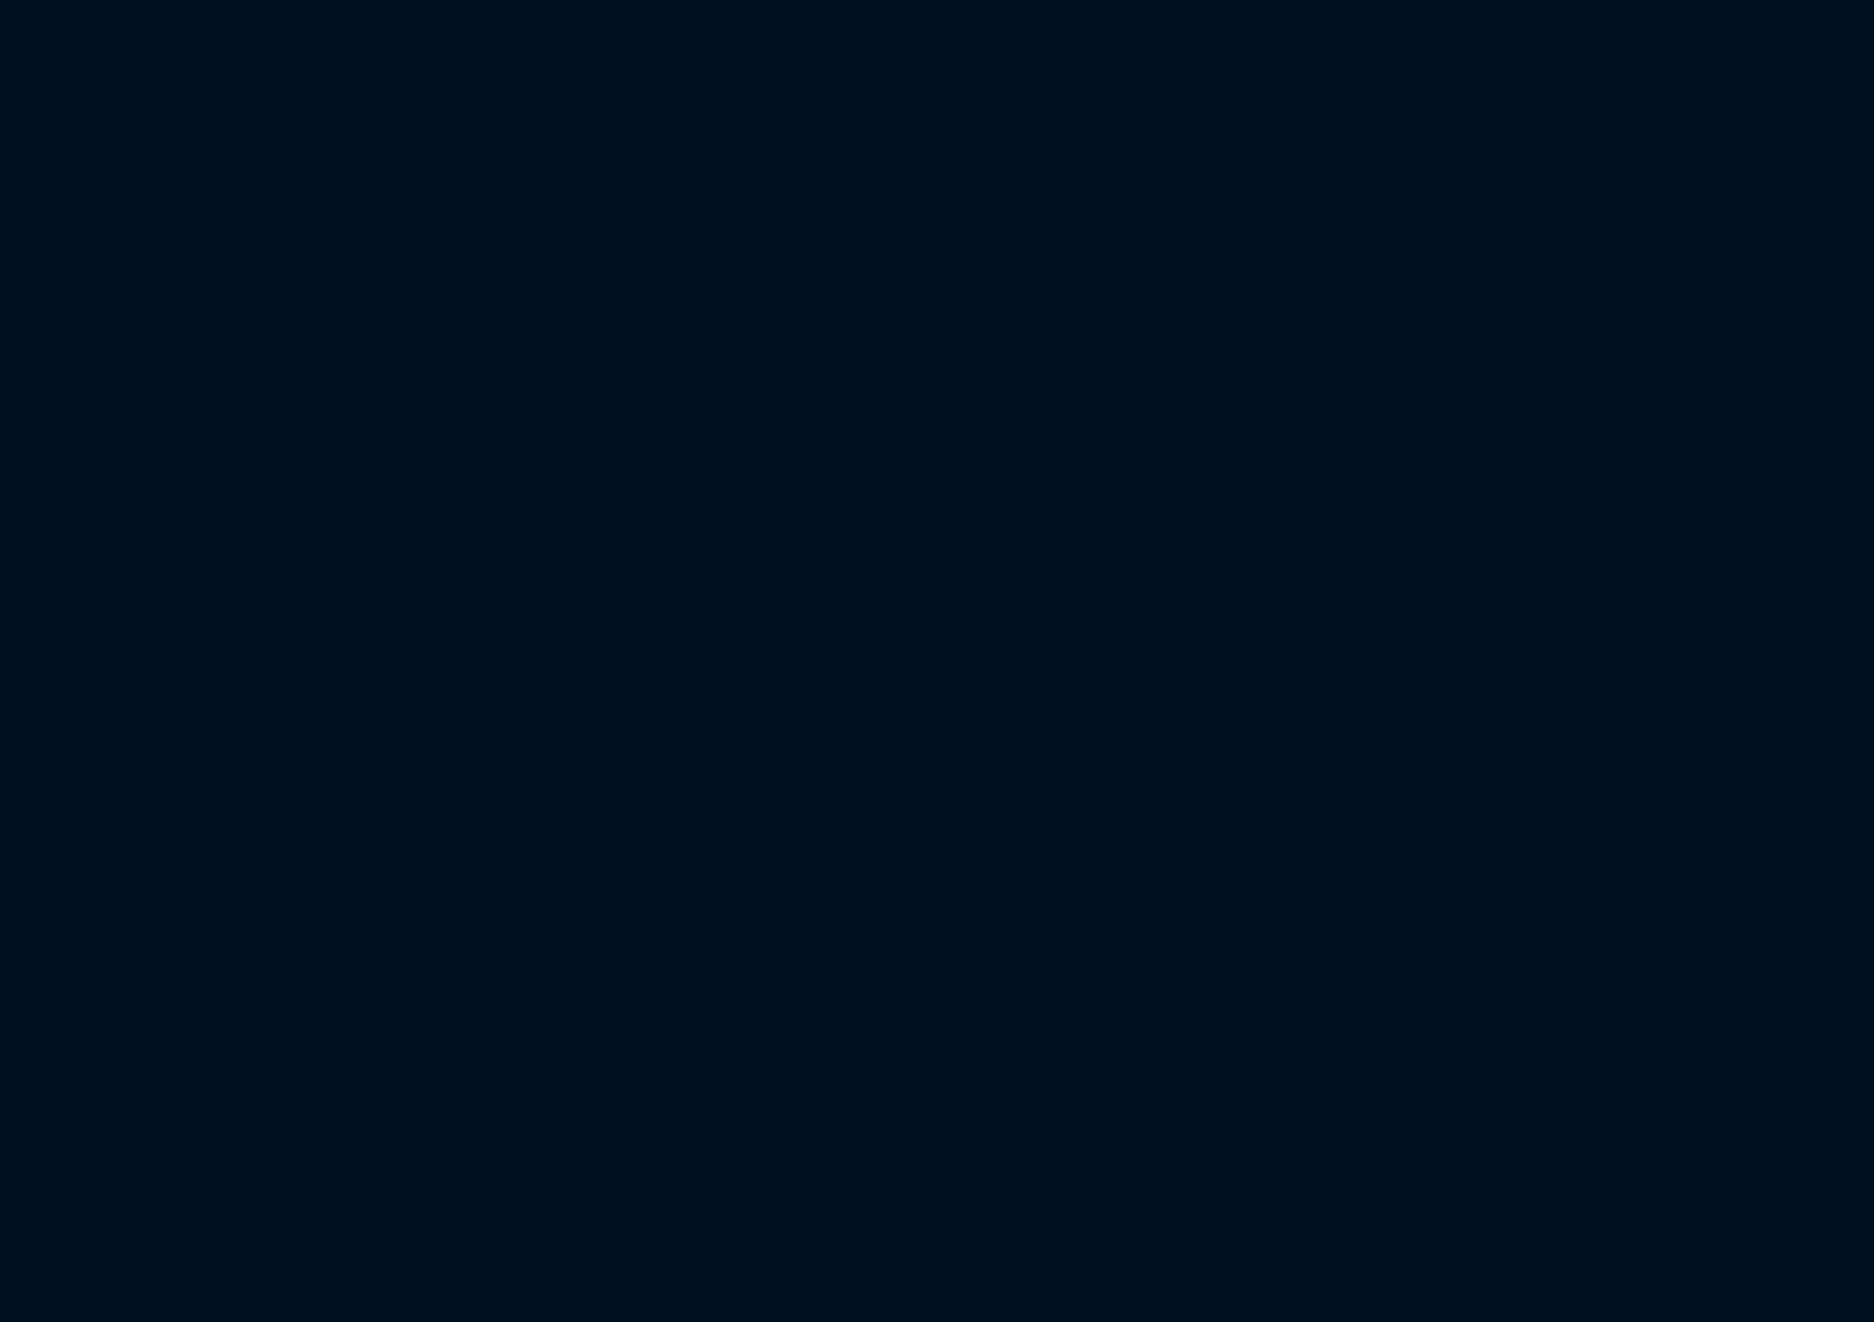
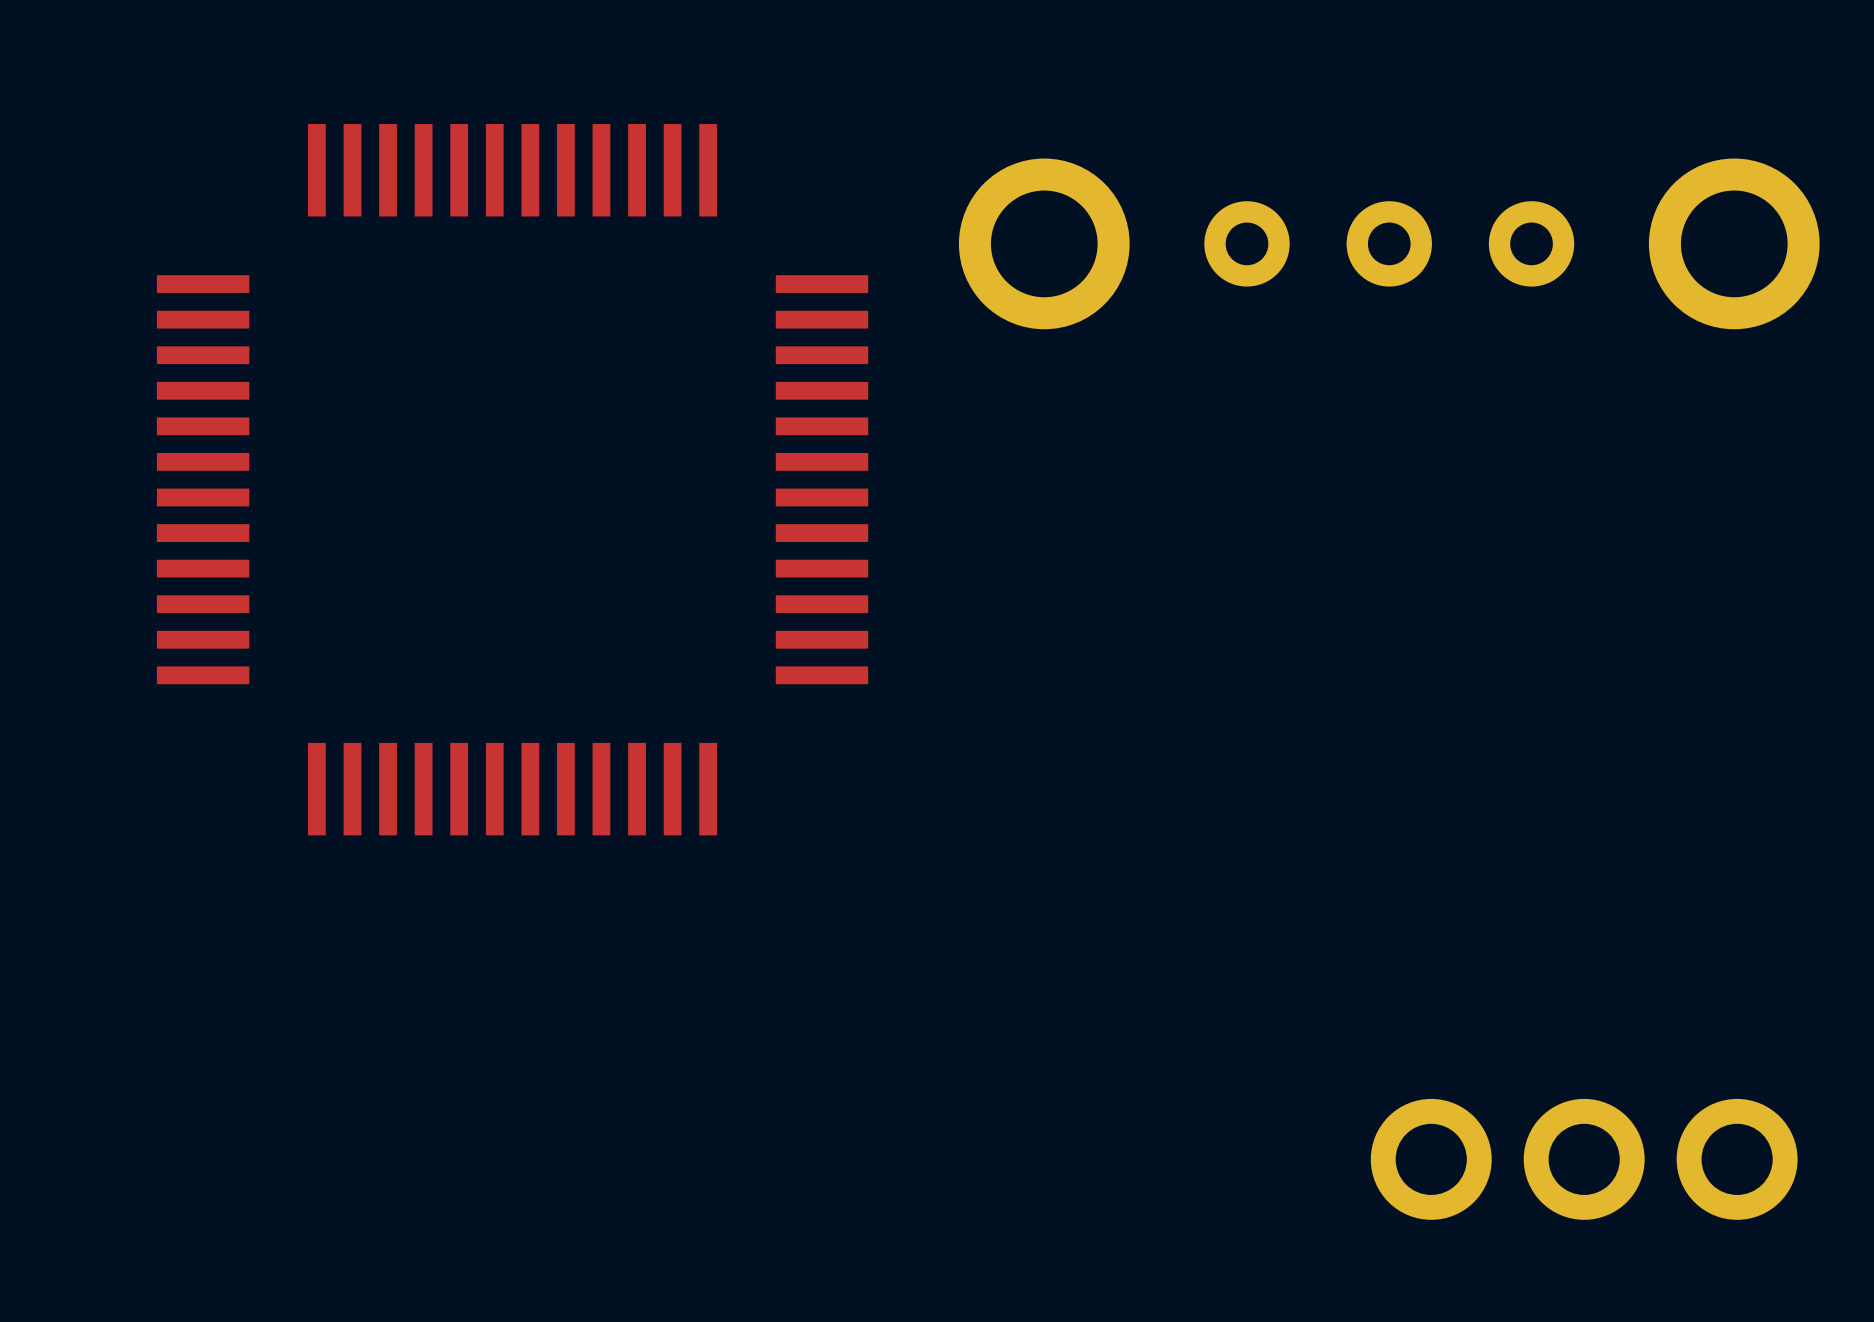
part: none -> (1389, 243)
part: none -> (512, 479)
part: none -> (1584, 1159)

